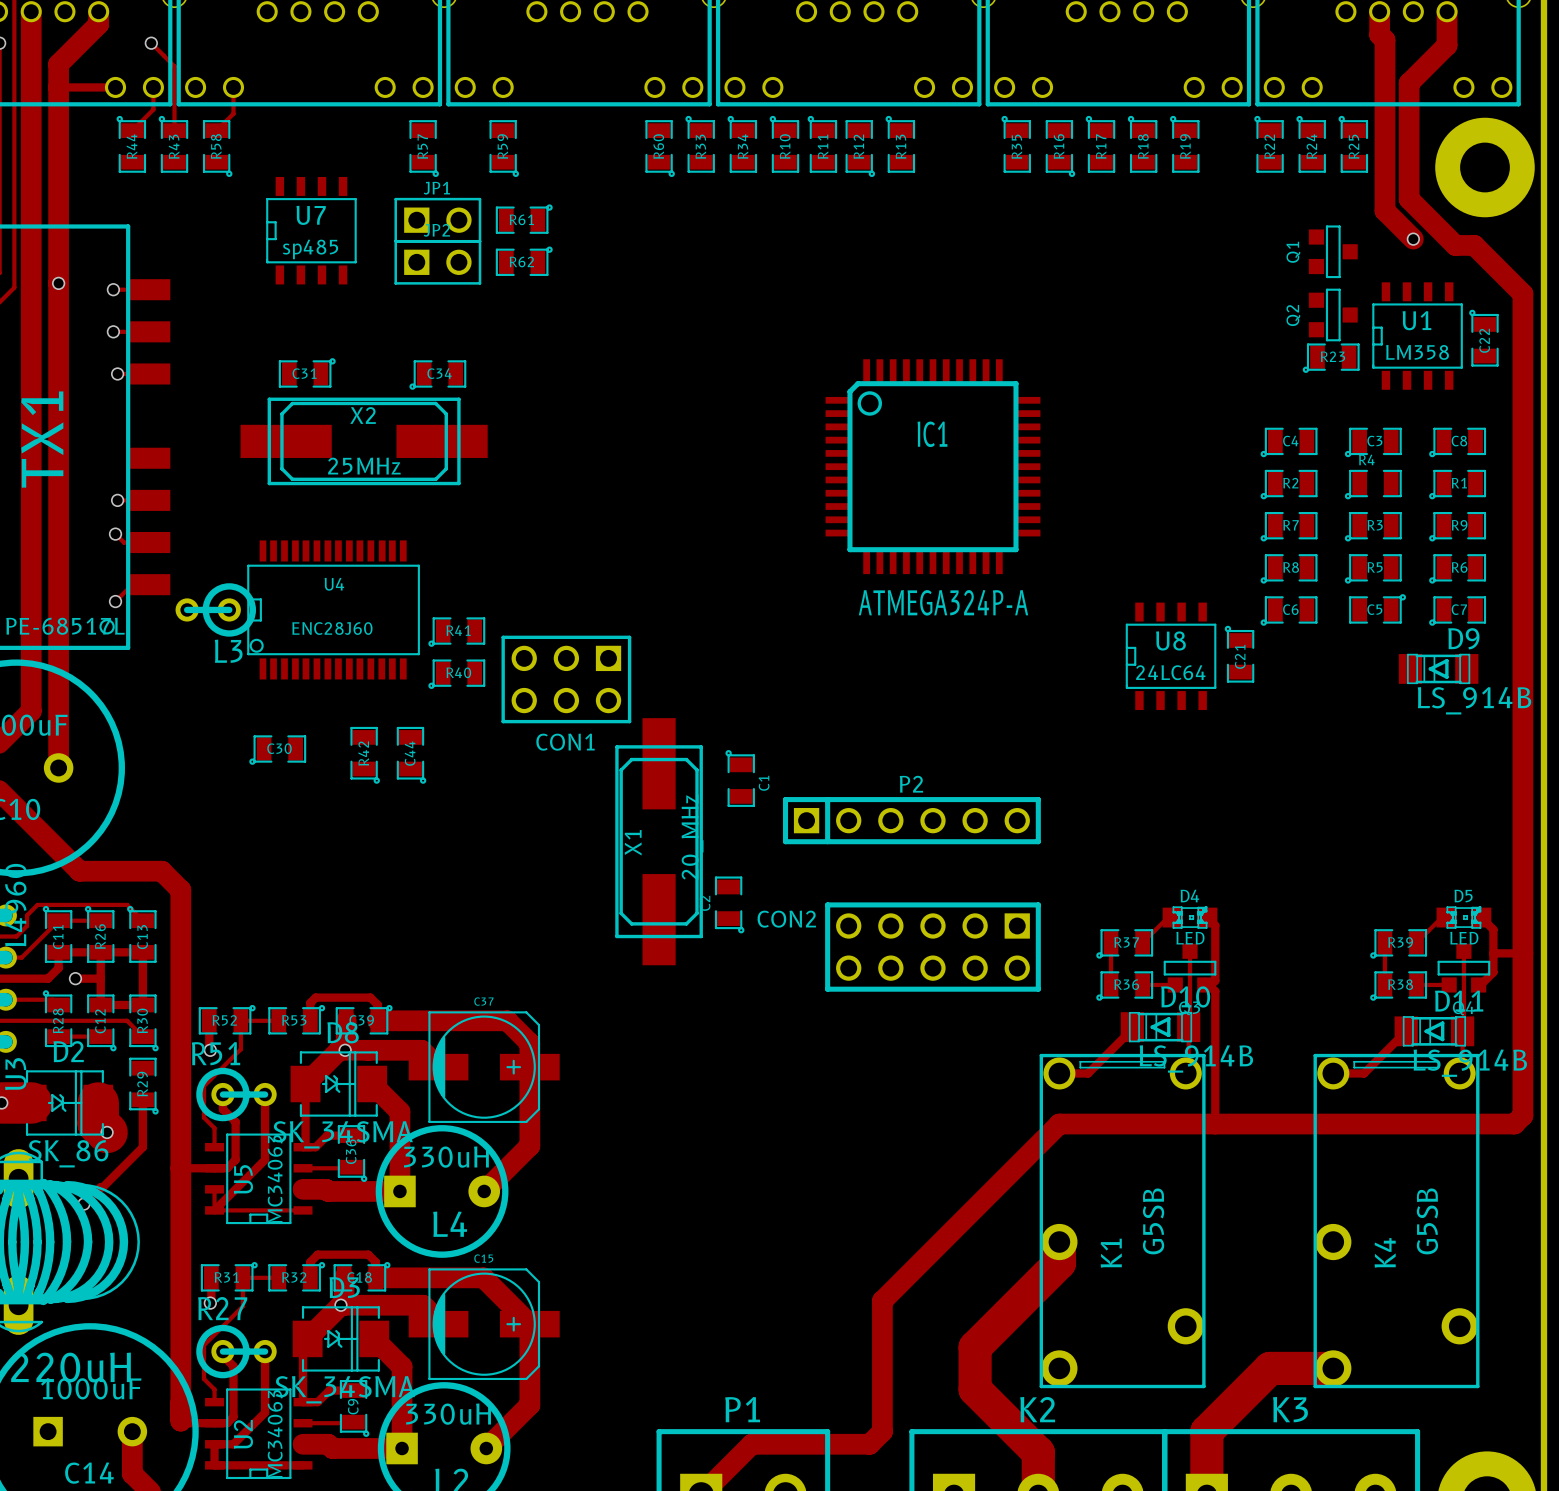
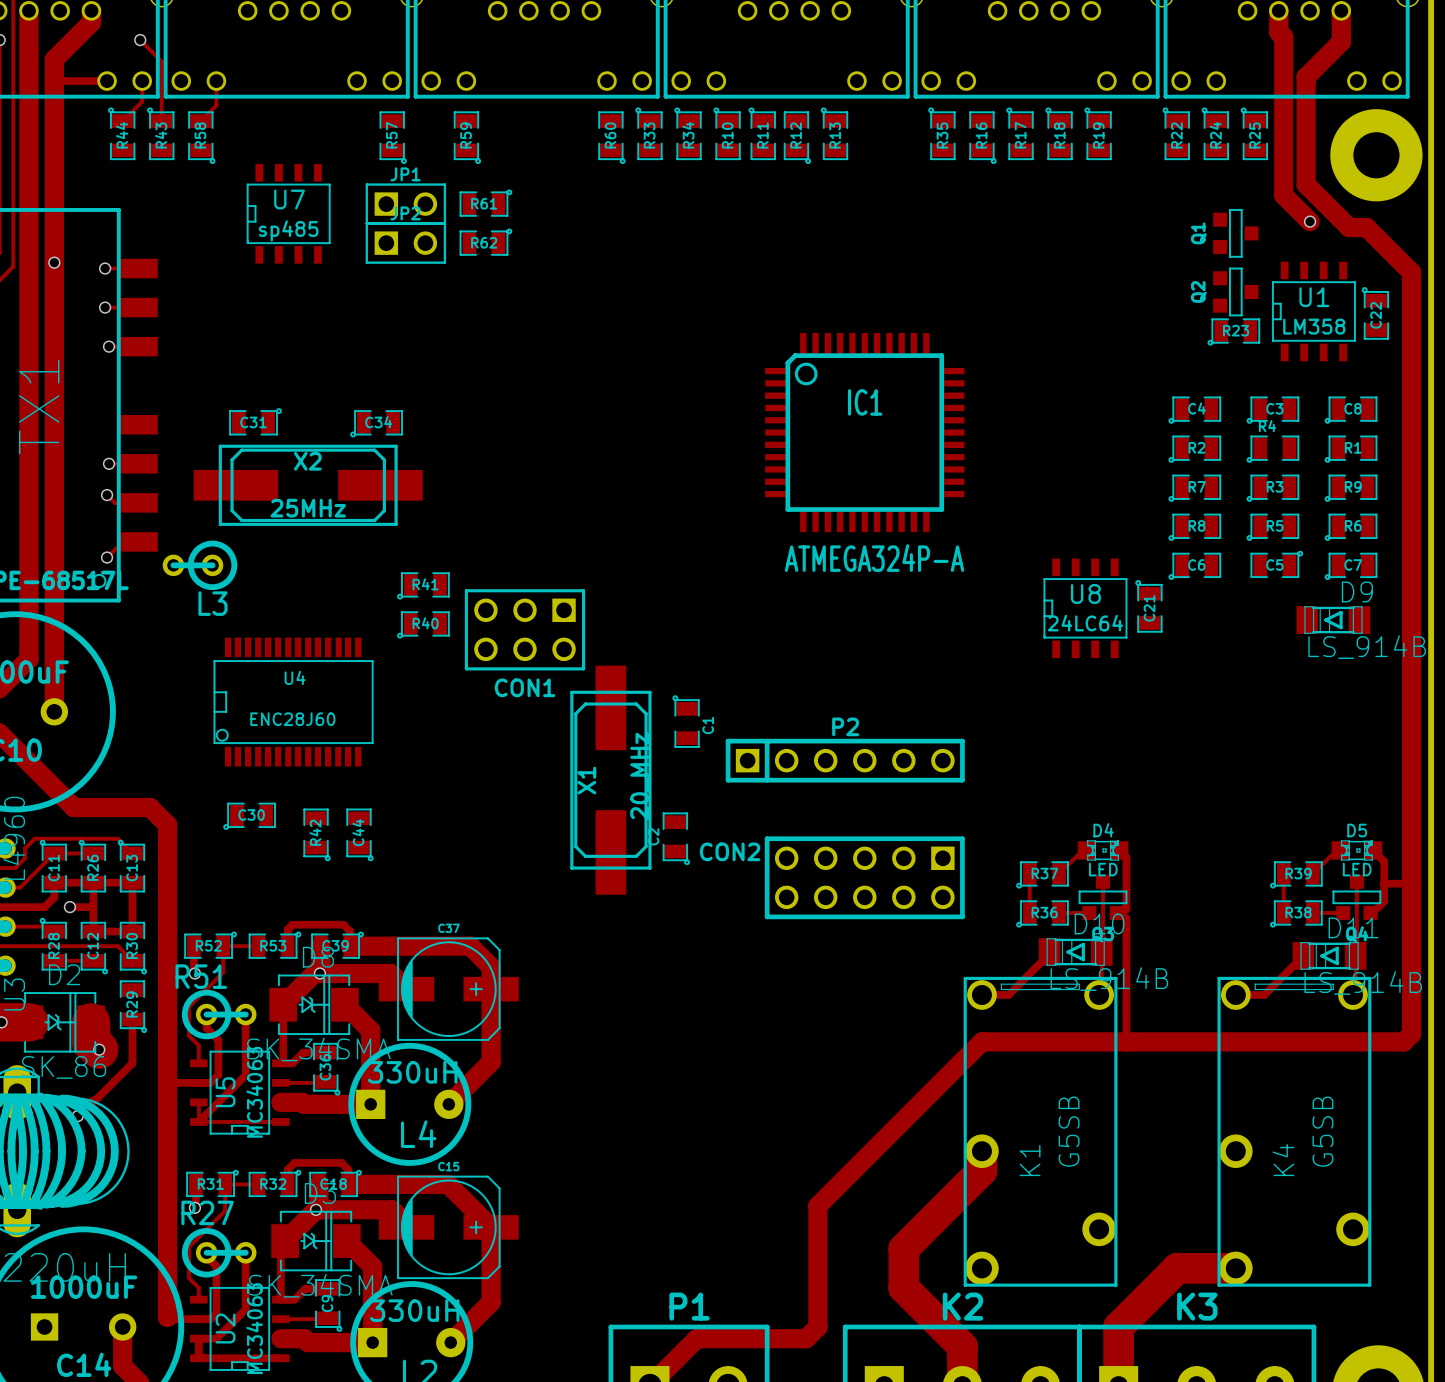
C31 position: (307, 372) -> (255, 421)
C34 position: (437, 375) -> (376, 423)
X2 position: (364, 441) -> (308, 485)
U4 position: (333, 609) -> (293, 702)
C30 position: (277, 750) -> (249, 816)
R42 position: (365, 755) -> (317, 834)
C44 position: (411, 755) -> (359, 834)

